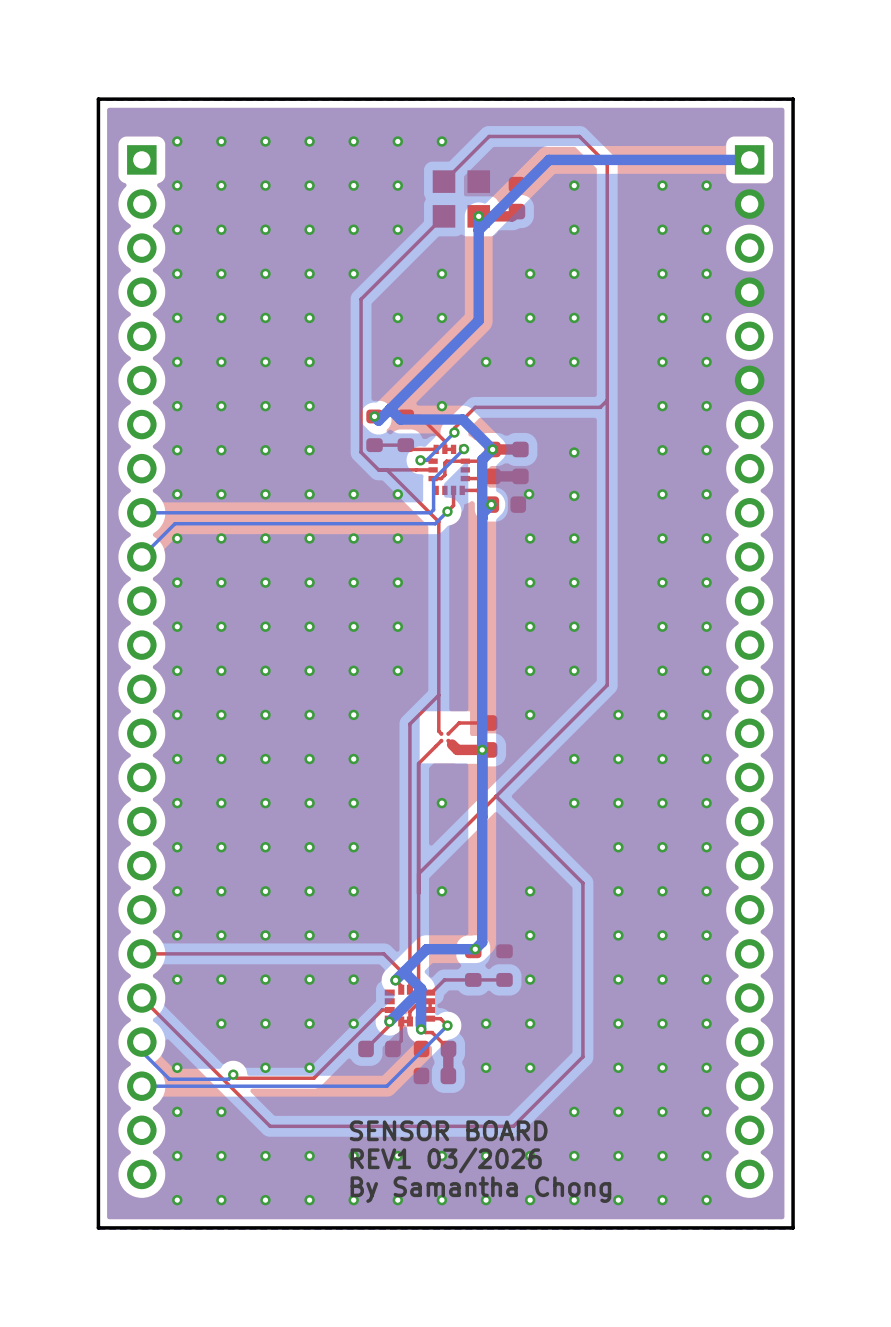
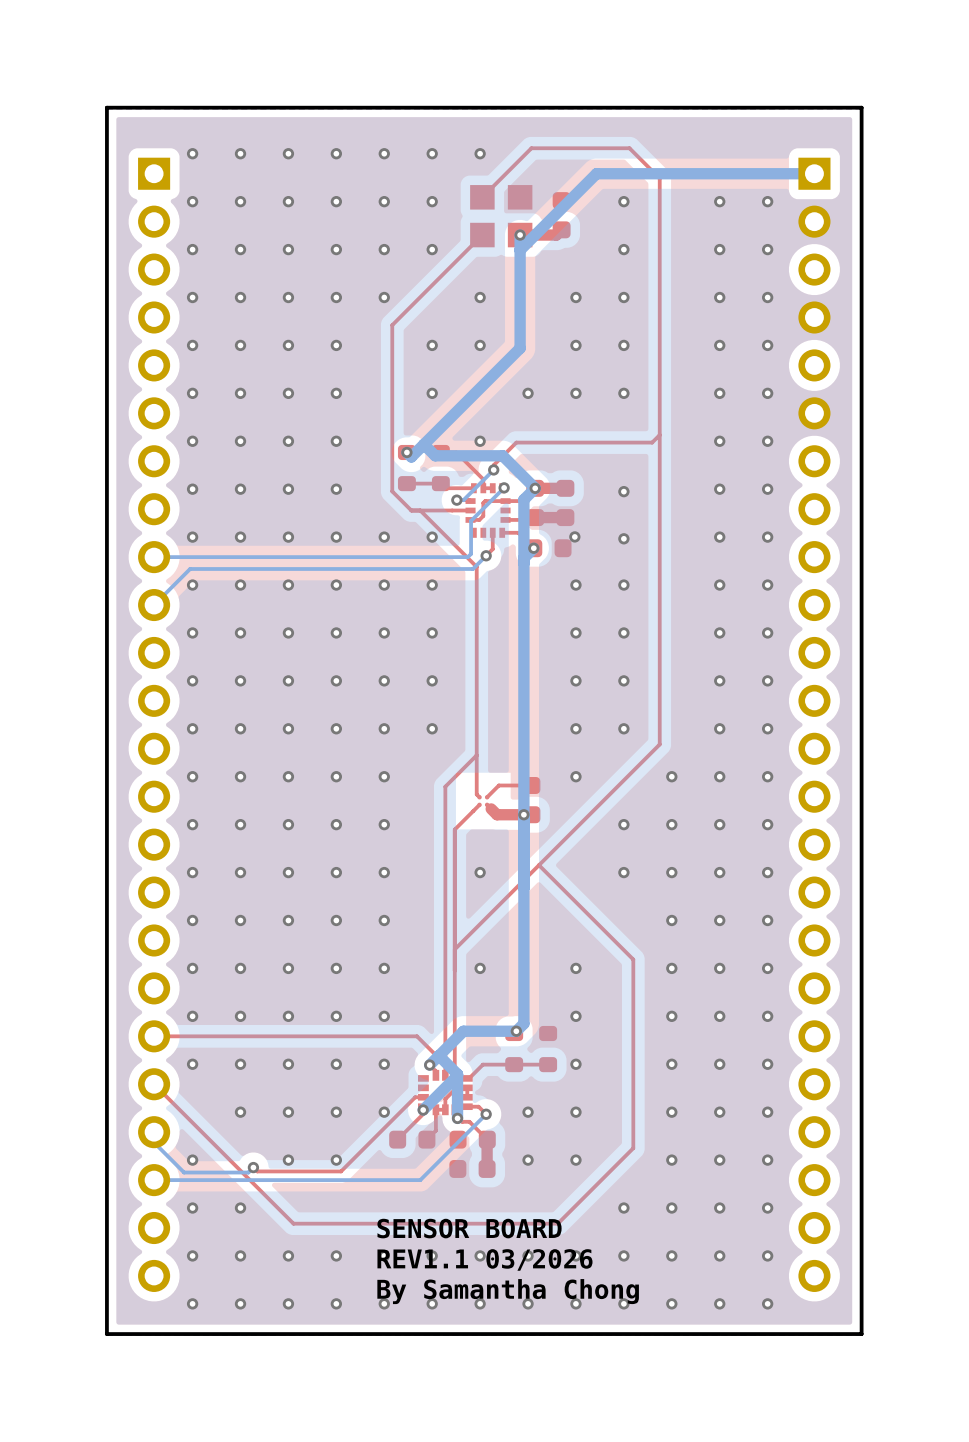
text: REV1 03/2026 (446, 1160) -> REV1.1 03/2026 (484, 1259)

